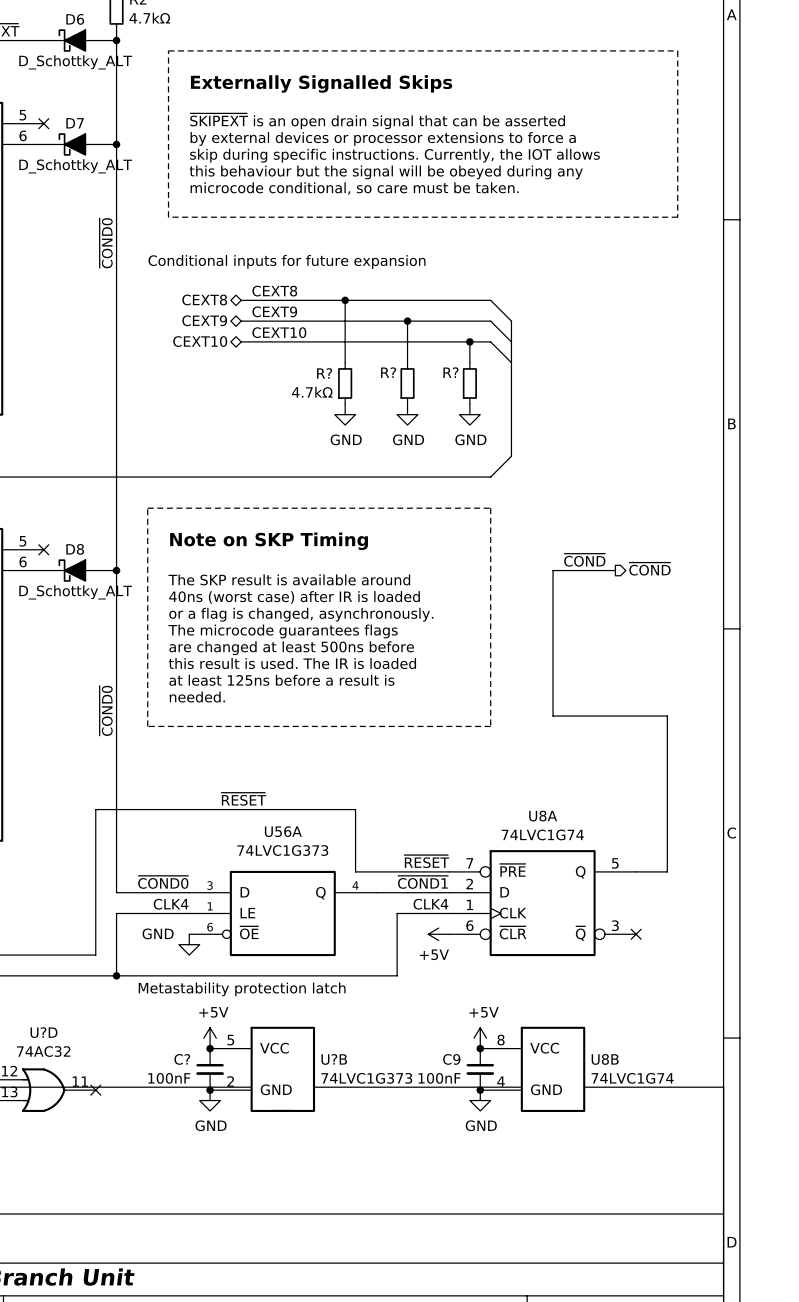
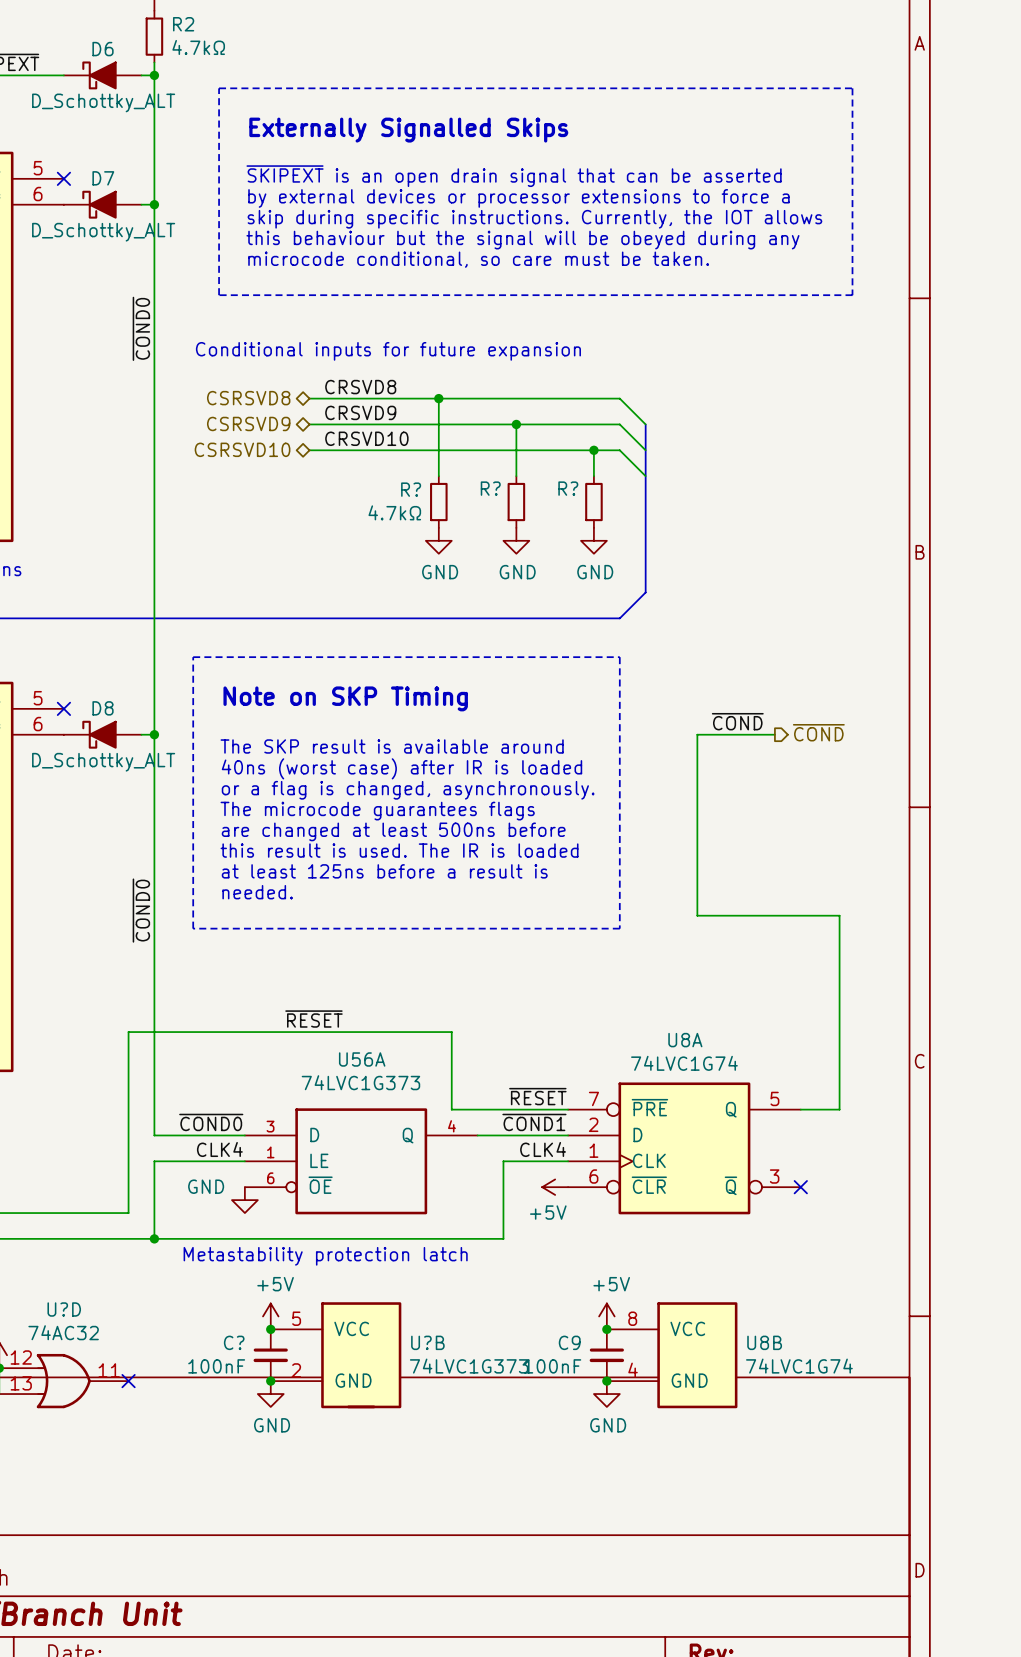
label: CEXT8 (274, 291) -> CRSVD8 (360, 387)
hierarchical label: CEXT8 (204, 299) -> CSRSVD8 (248, 398)
label: CEXT9 (274, 311) -> CRSVD9 (360, 412)
hierarchical label: CEXT9 (204, 320) -> CSRSVD9 (248, 423)
label: CEXT10 (279, 332) -> CRSVD10 (366, 438)
hierarchical label: CEXT10 (200, 341) -> CSRSVD10 (242, 449)

